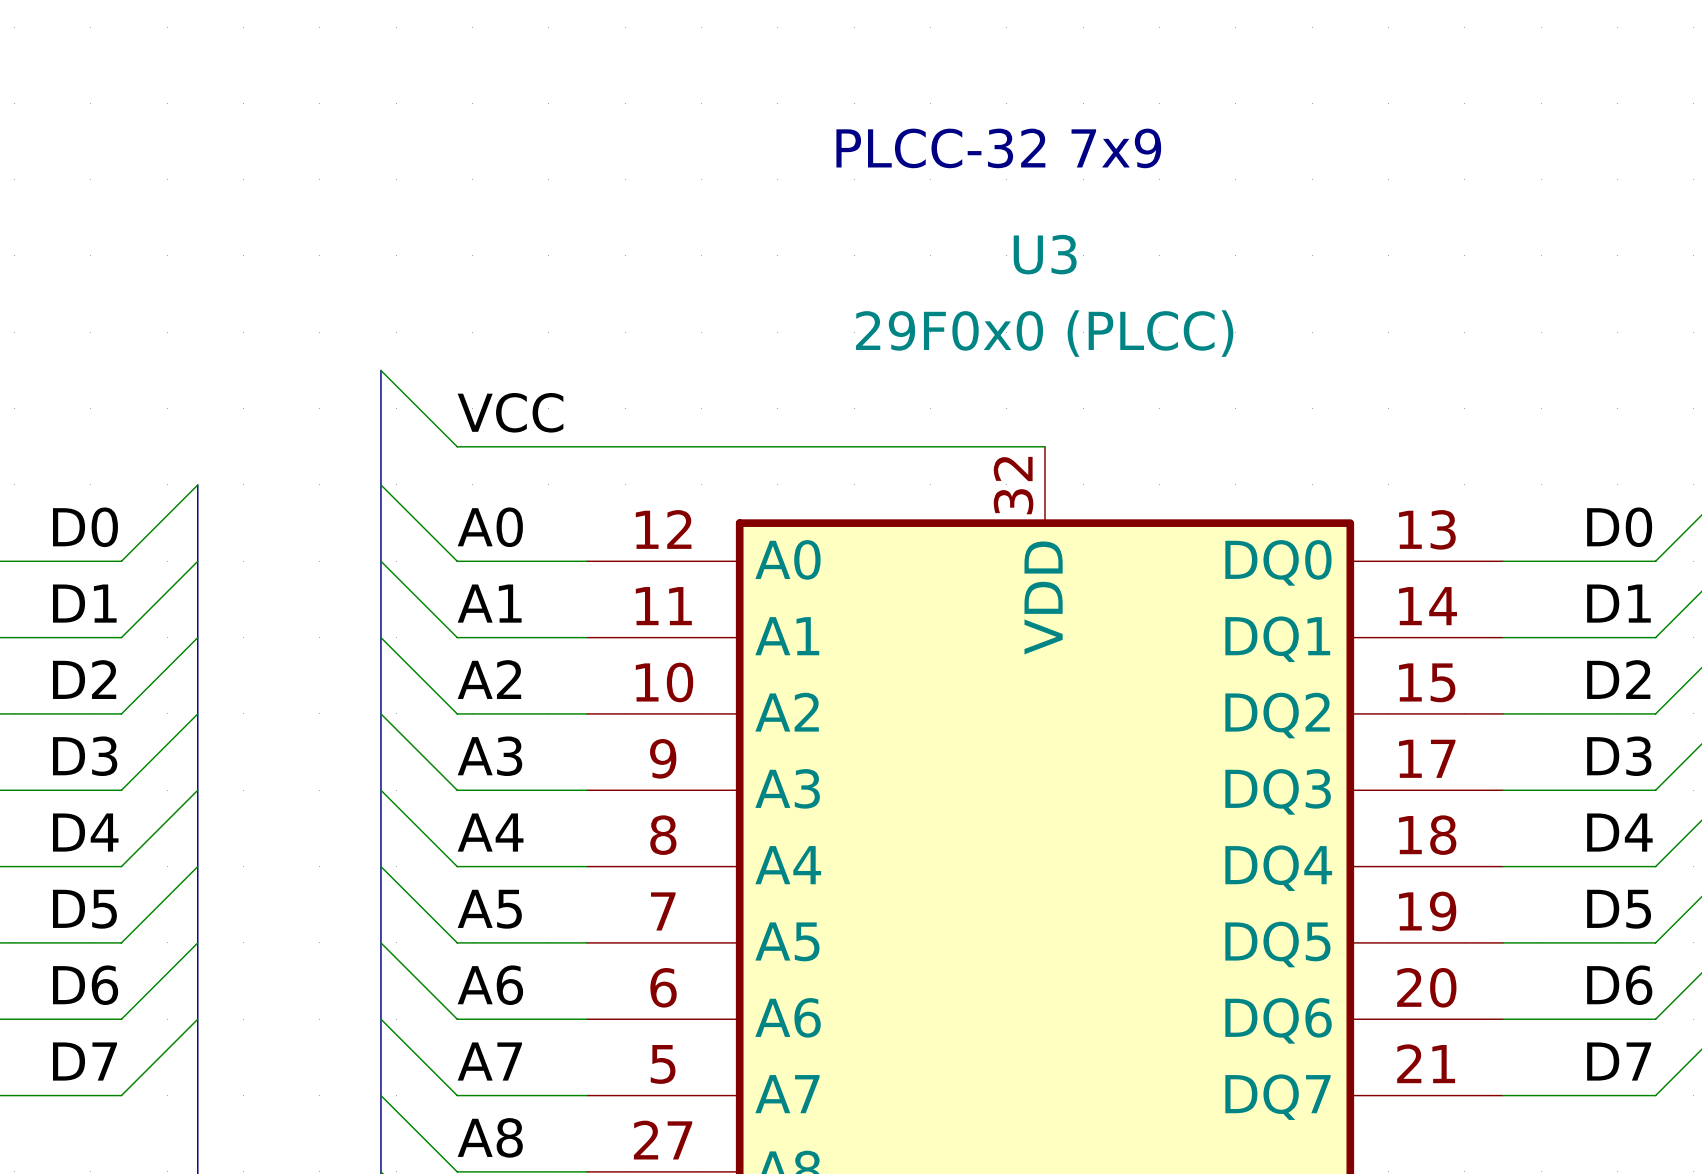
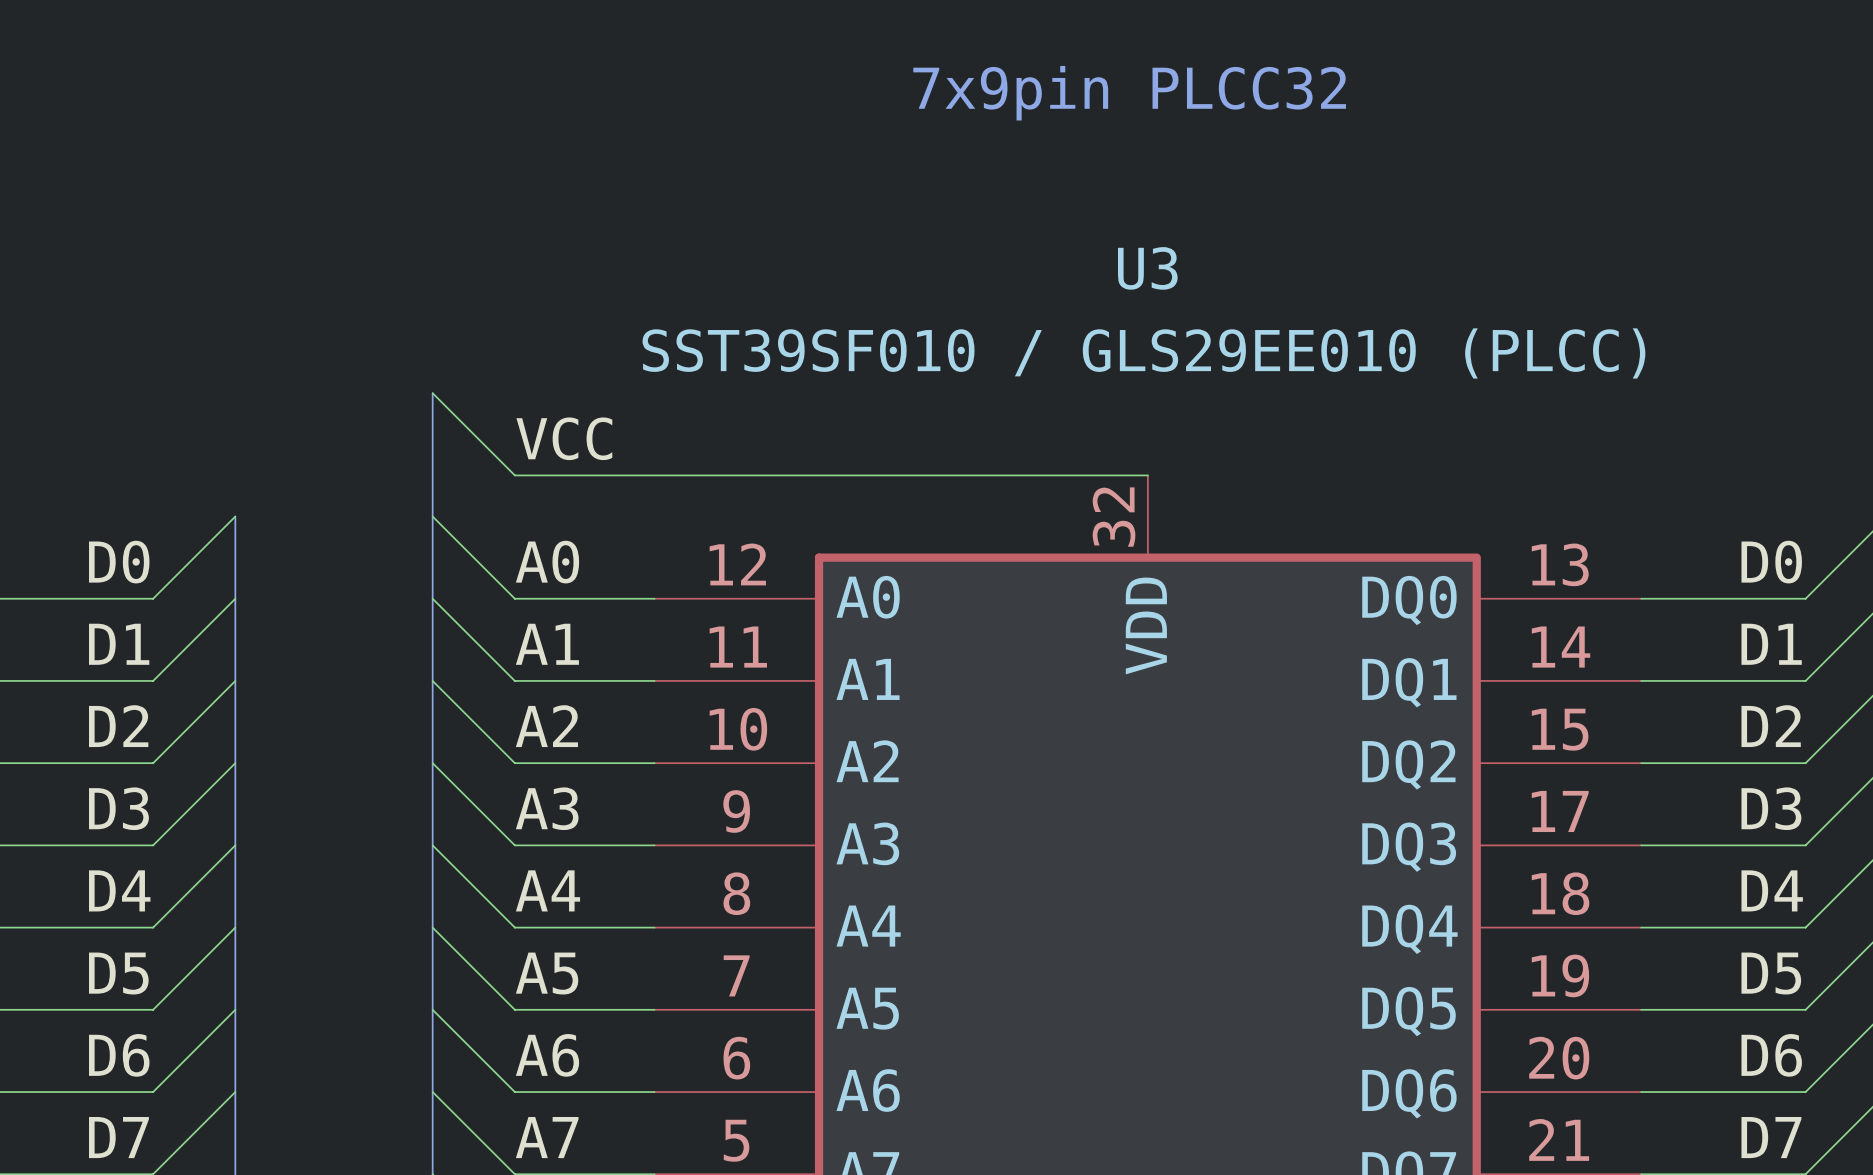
text: none -> 7x9pin PLCC32 (1129, 93)
text: PLCC-32 7x9 (998, 148) -> none
U3 value: 29F0x0 (PLCC) (1044, 333) -> SST39SF010 / GLS29EE010 (PLCC) (1143, 353)

